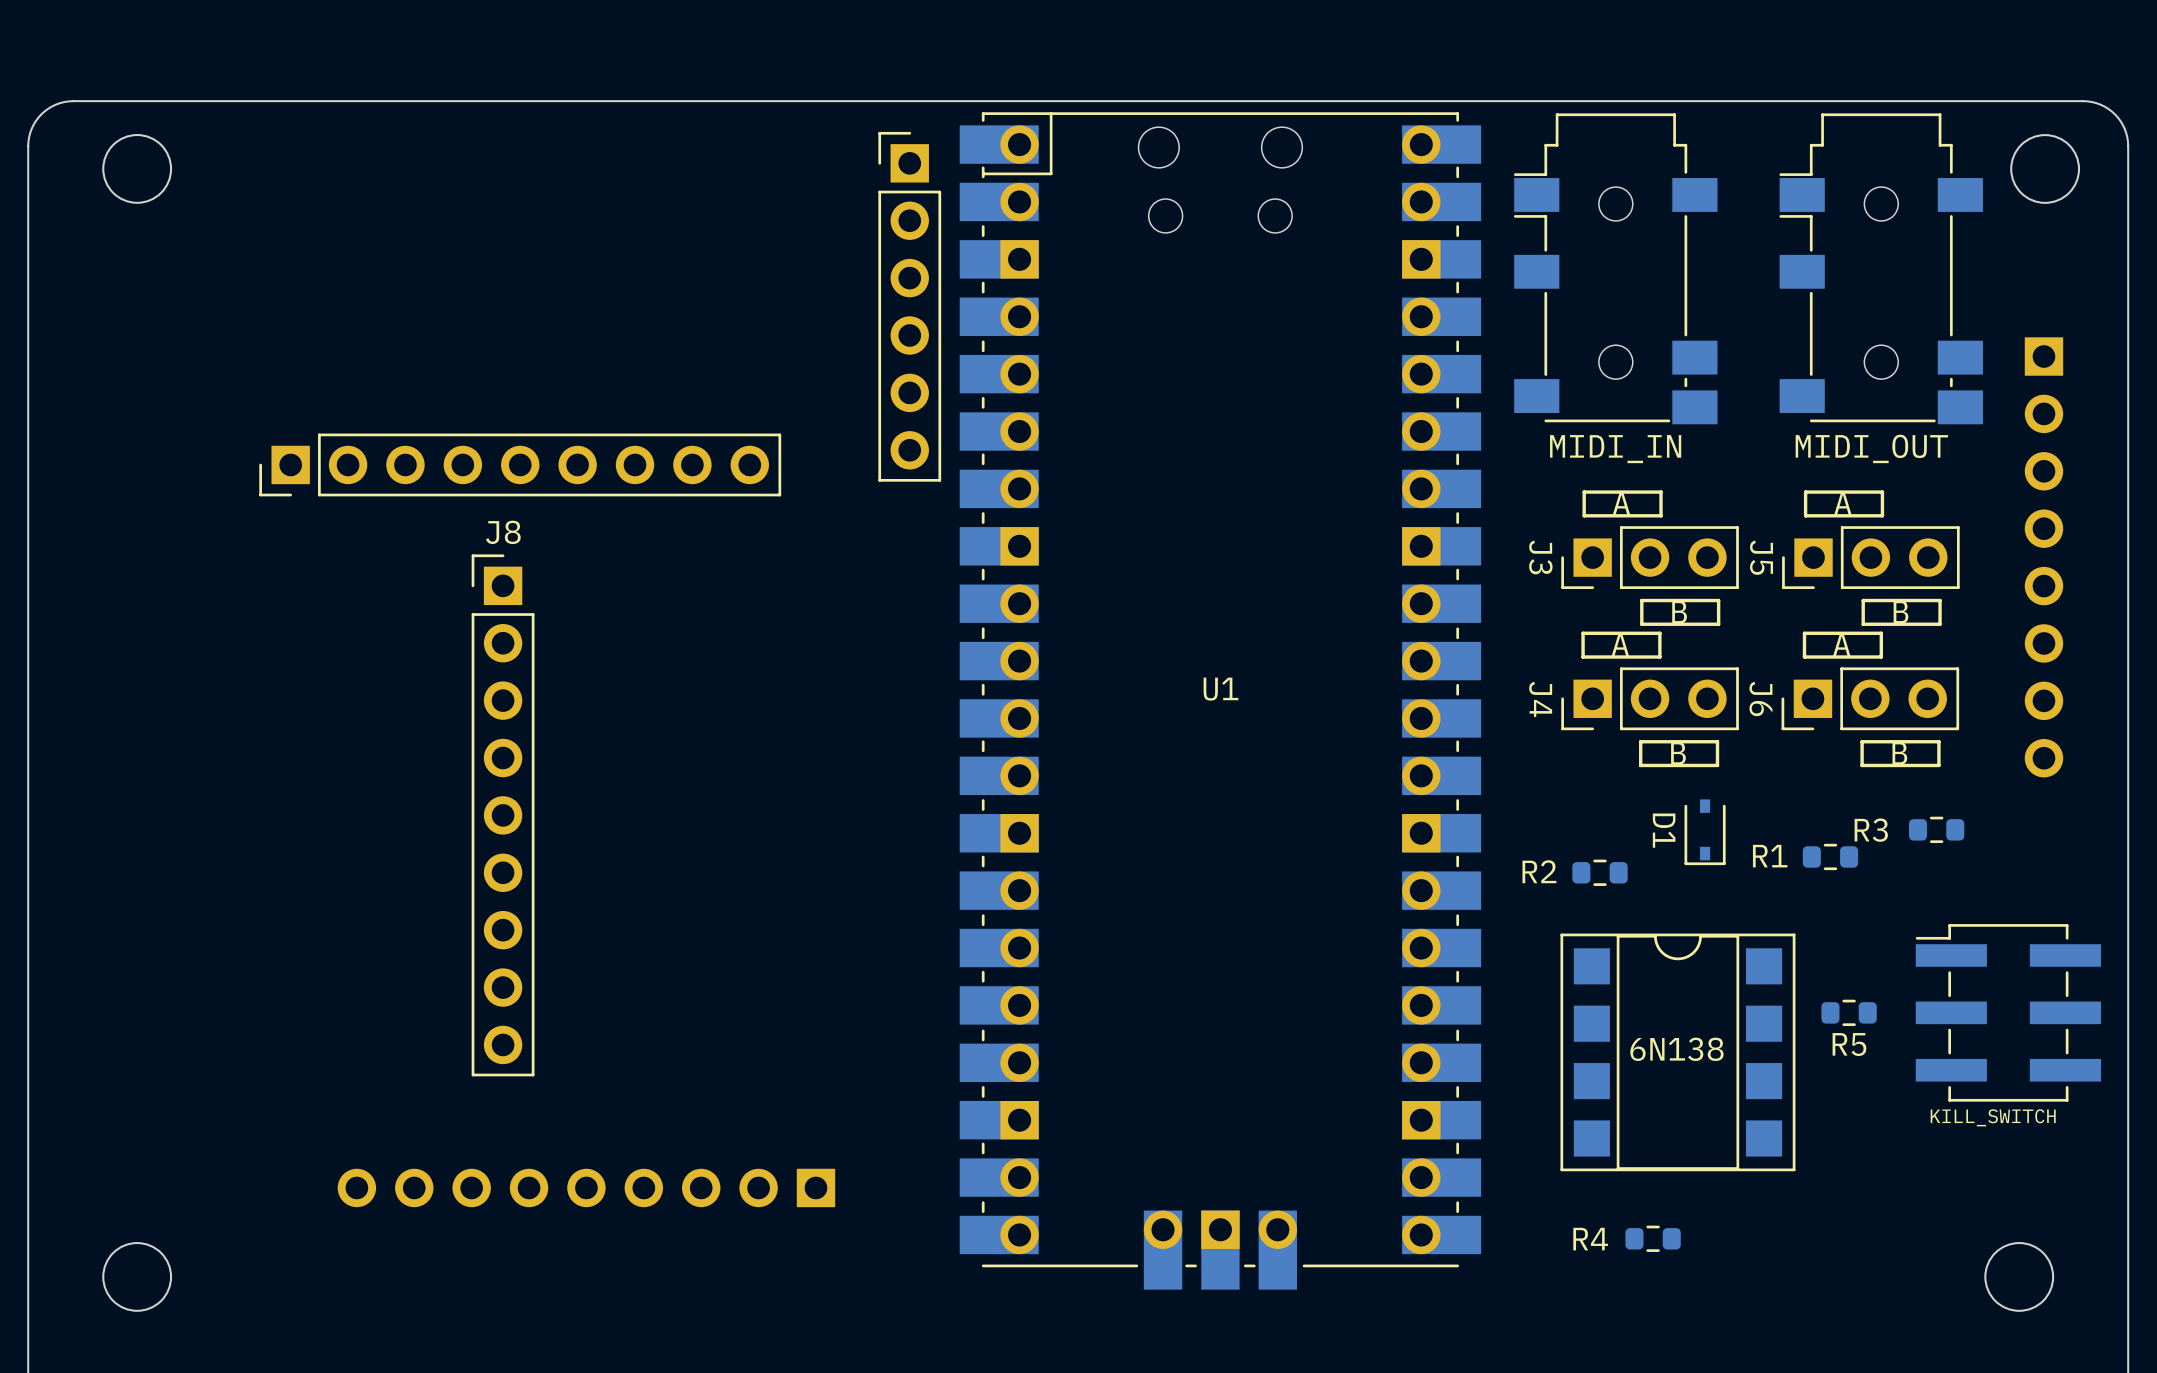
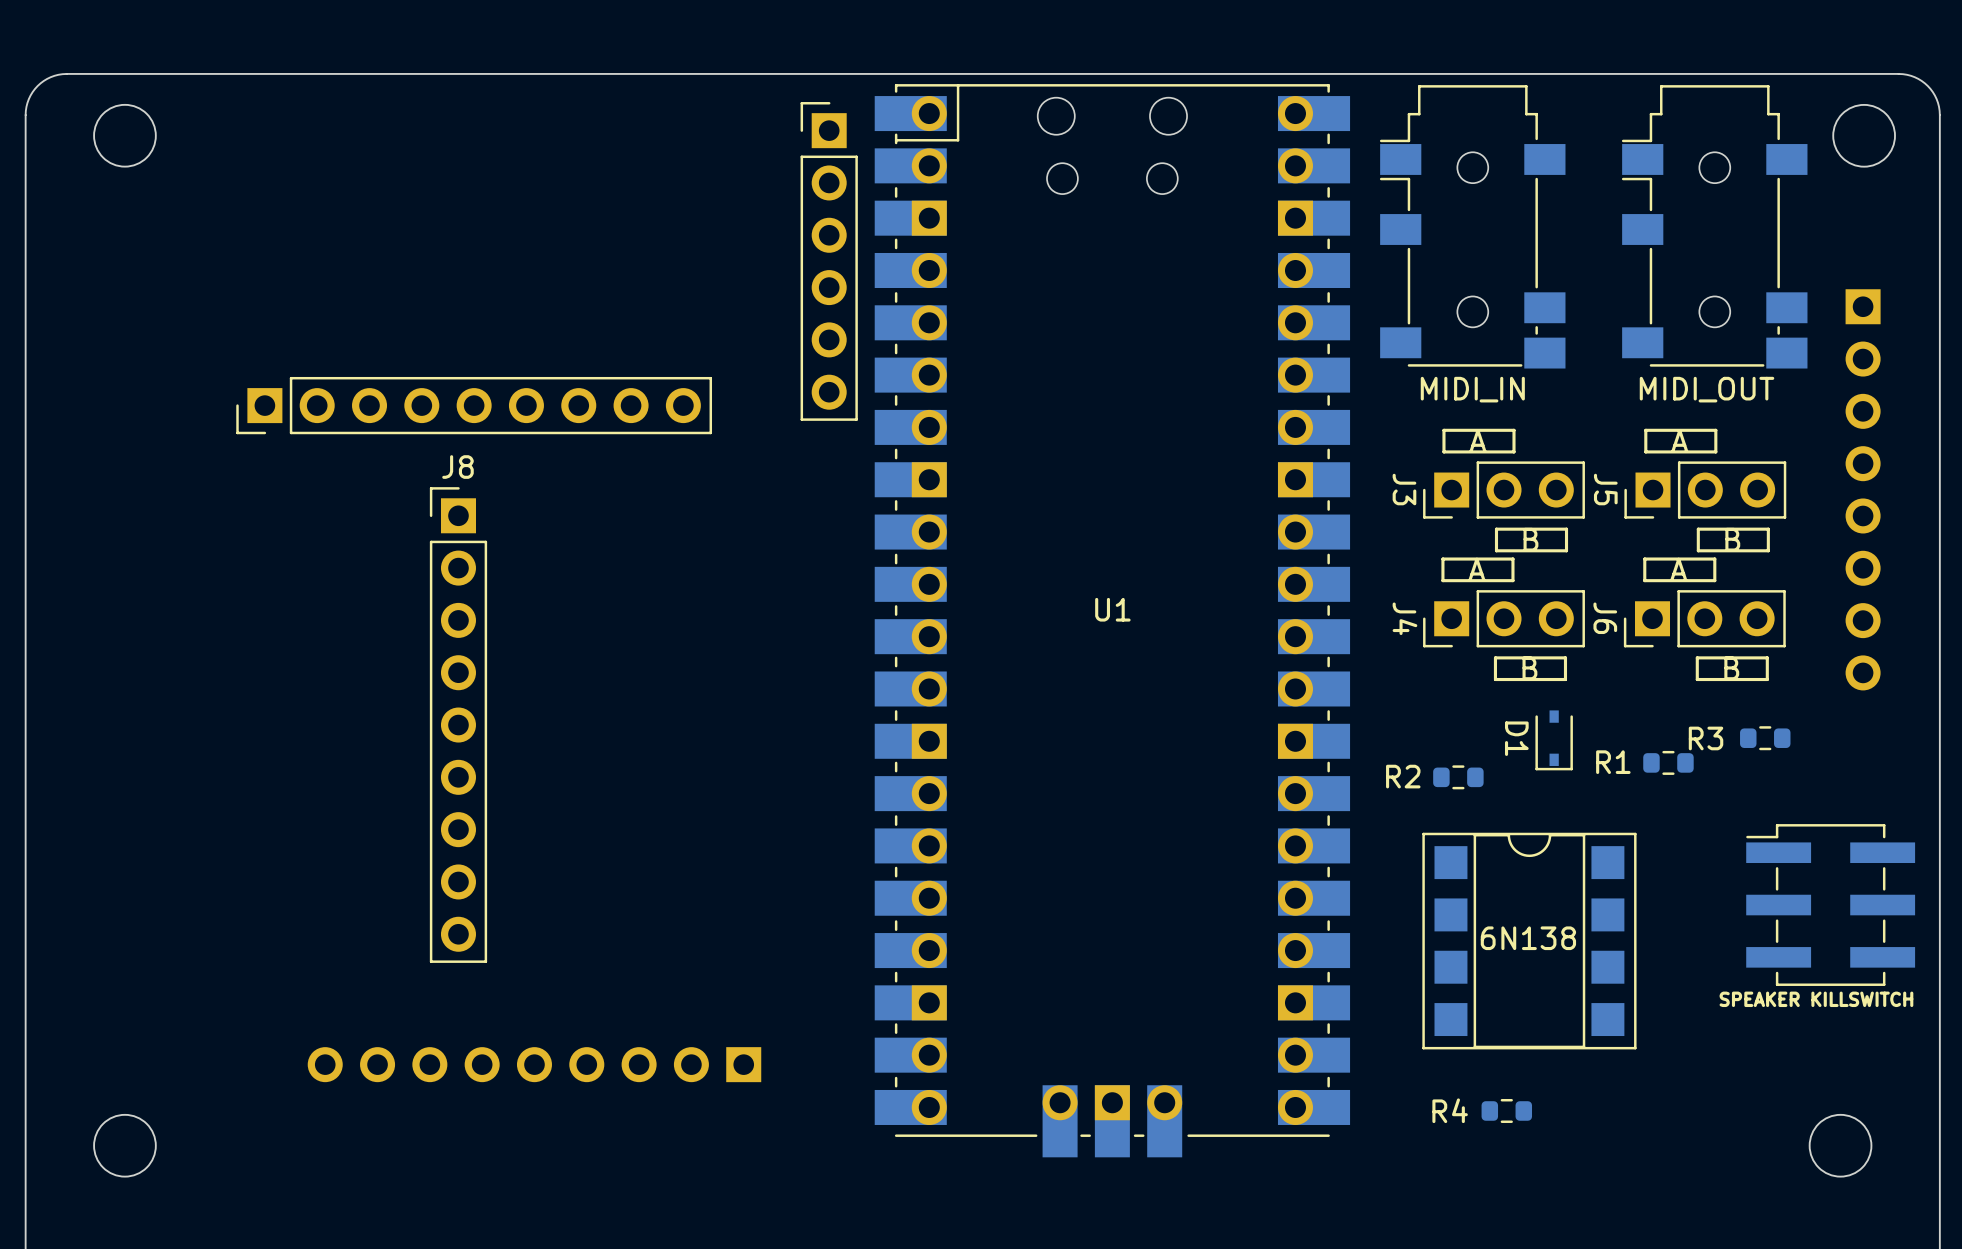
R5: (1849, 1012) -> none
part value: KILL_SWITCH (1993, 1117) -> SPEAKER KILLSWITCH (1816, 999)

